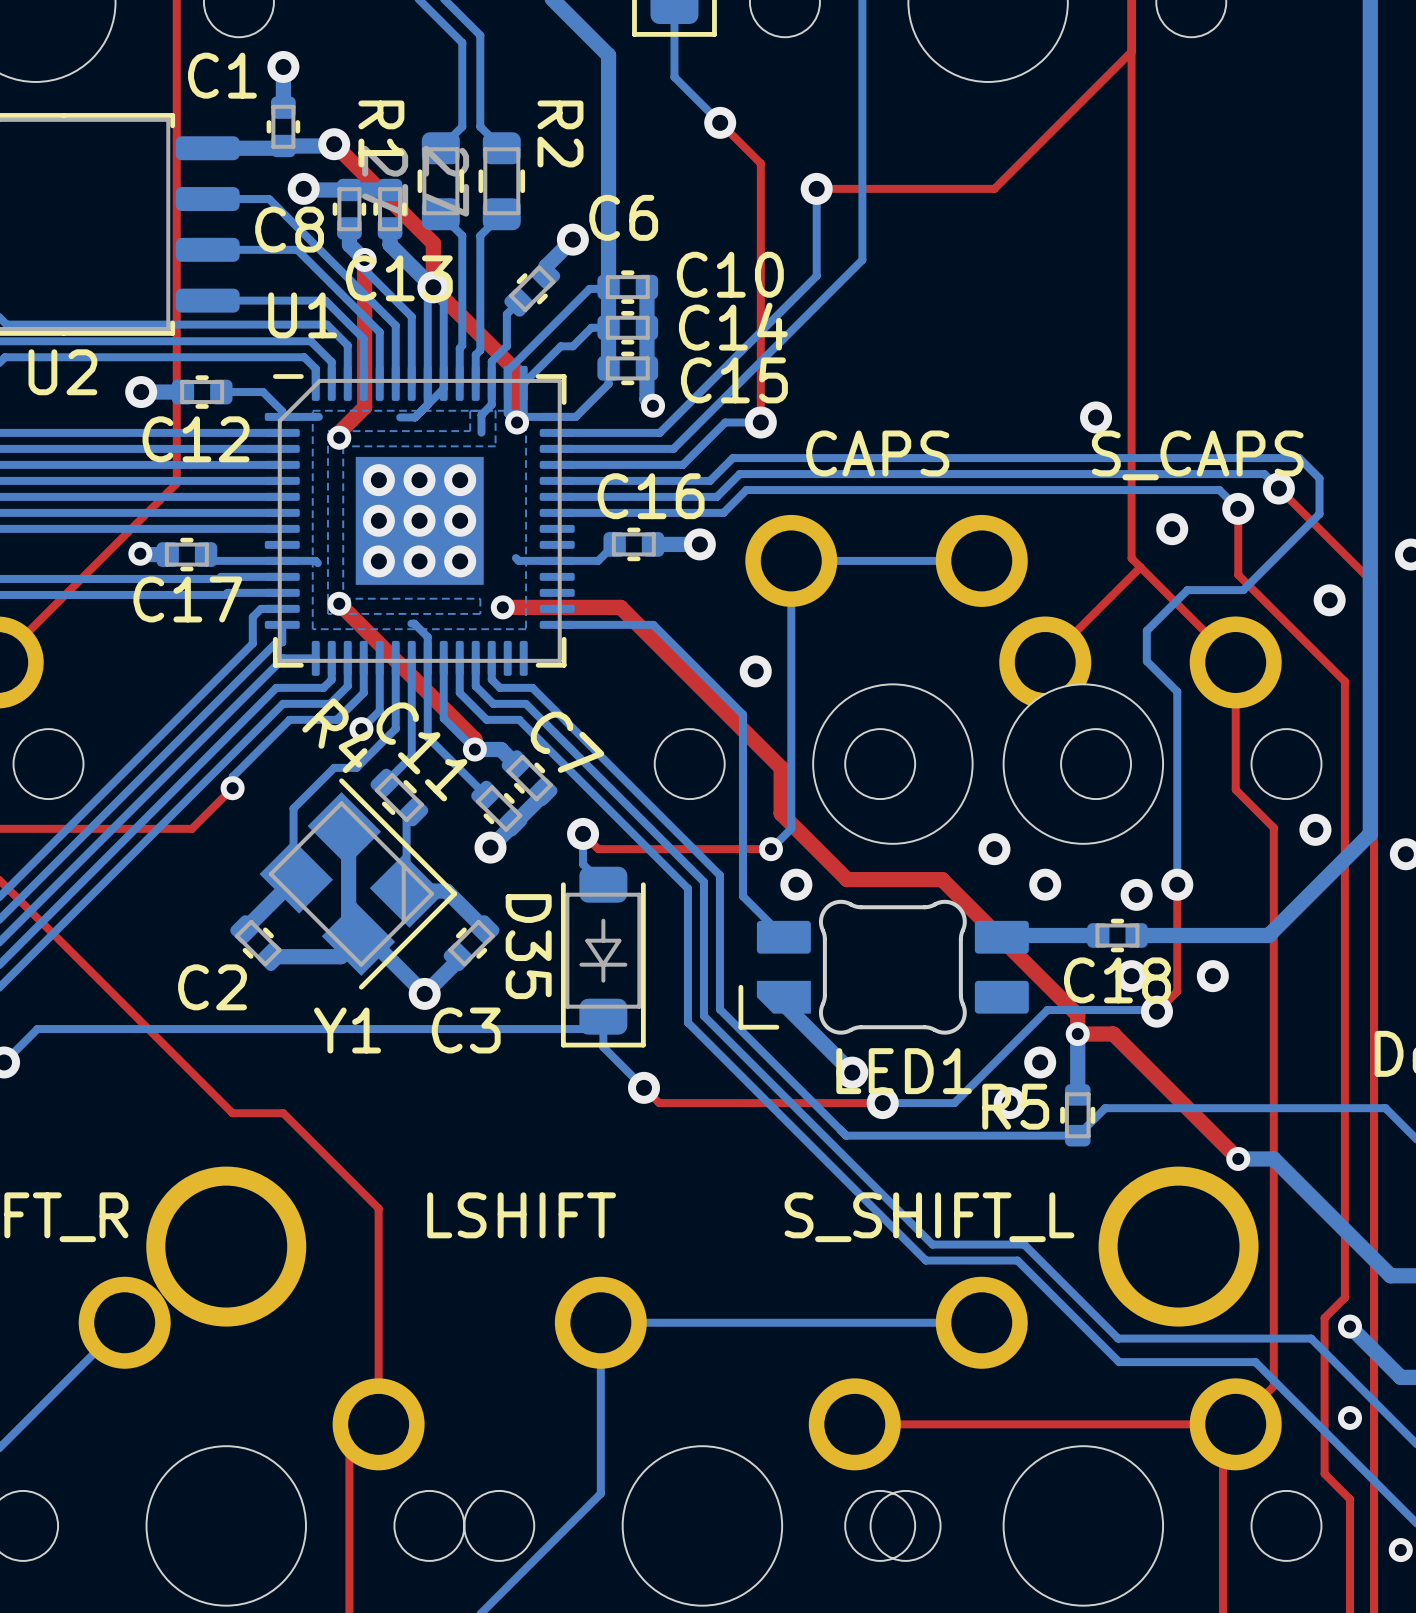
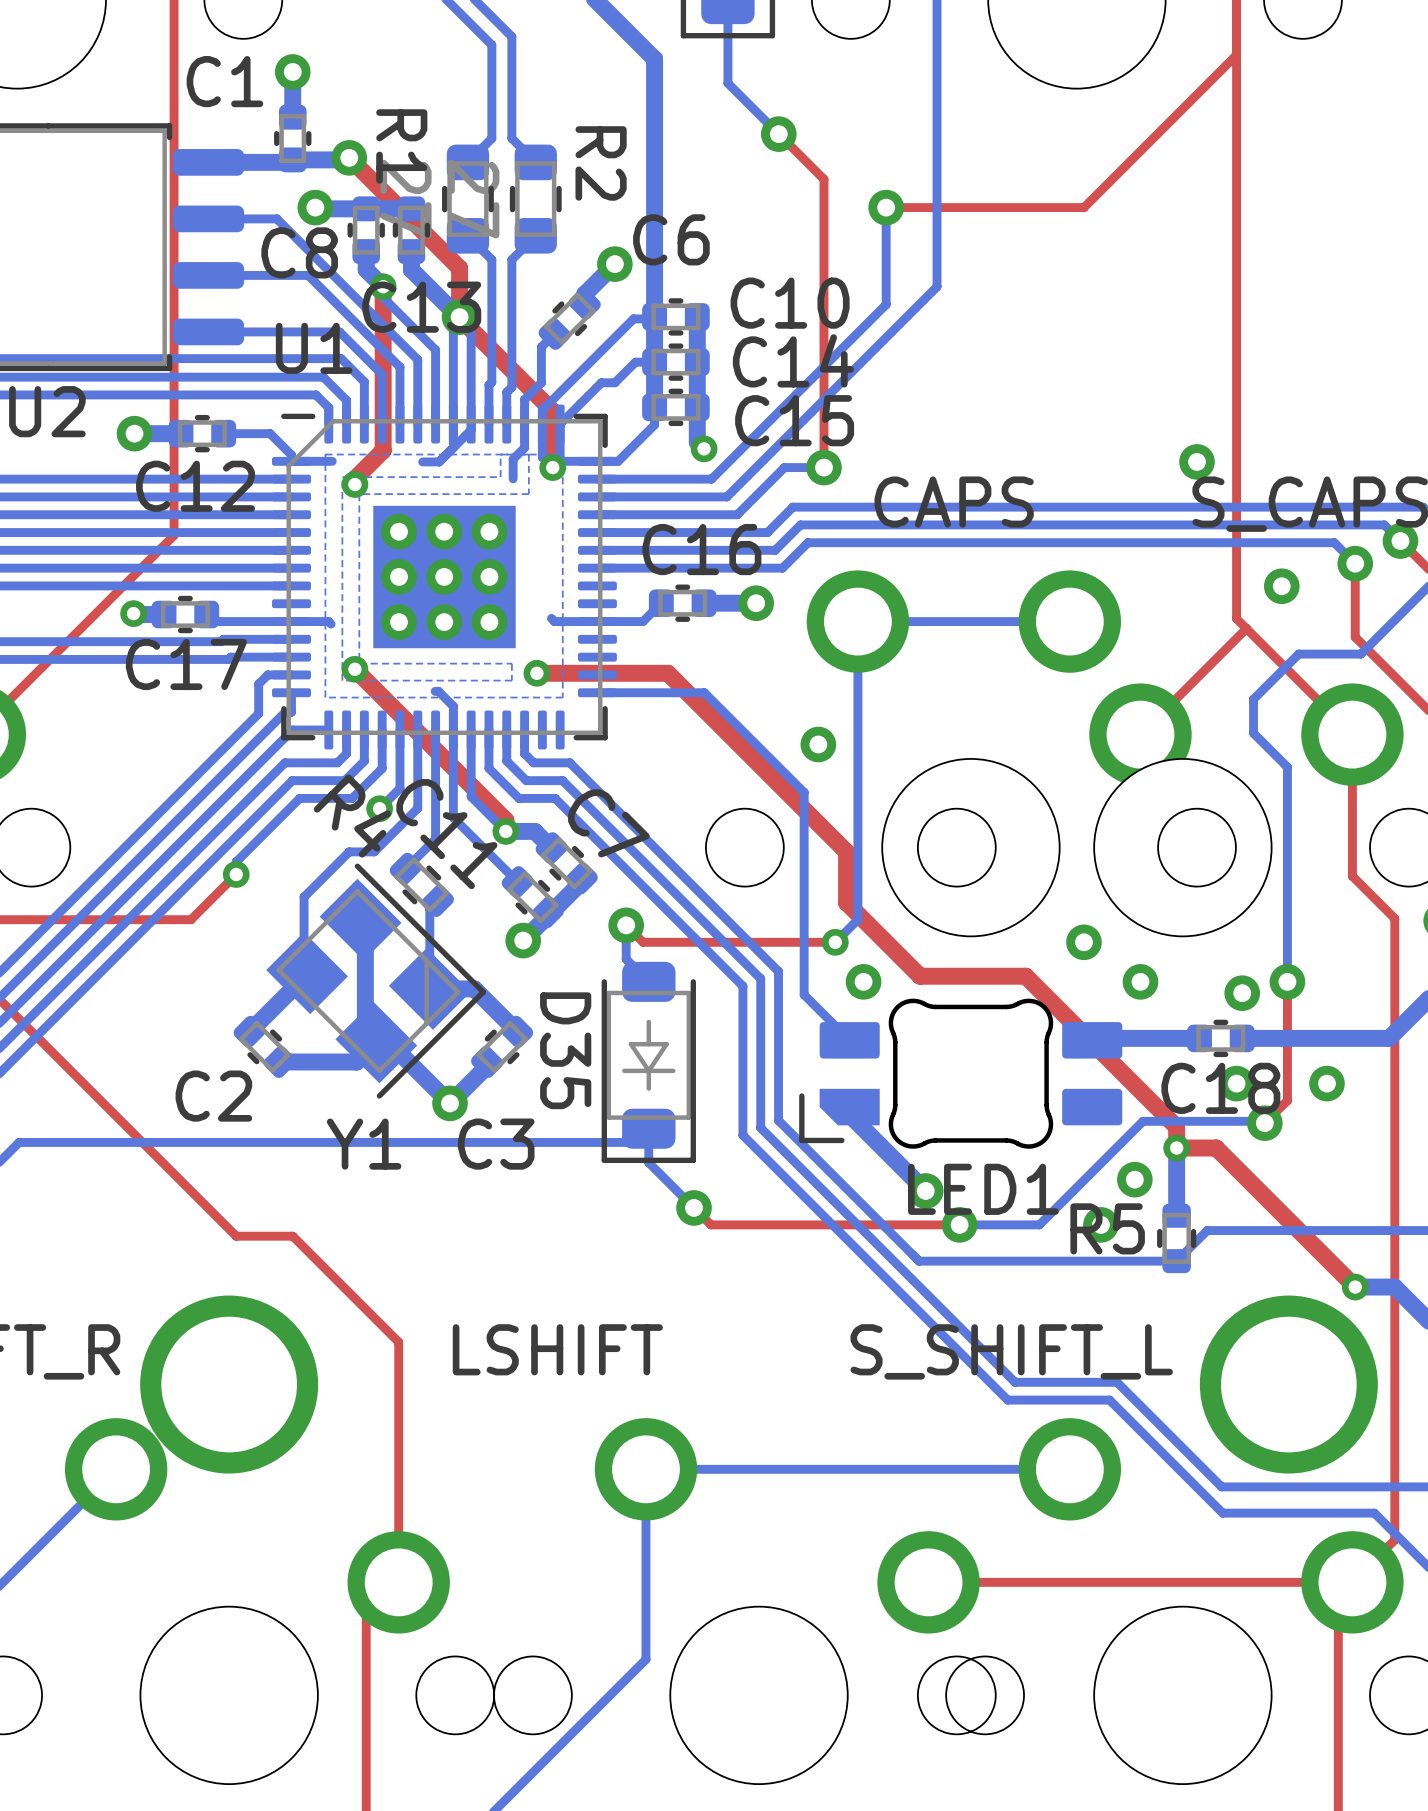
R2 name position: R2 (560, 133) -> R2 (601, 163)

